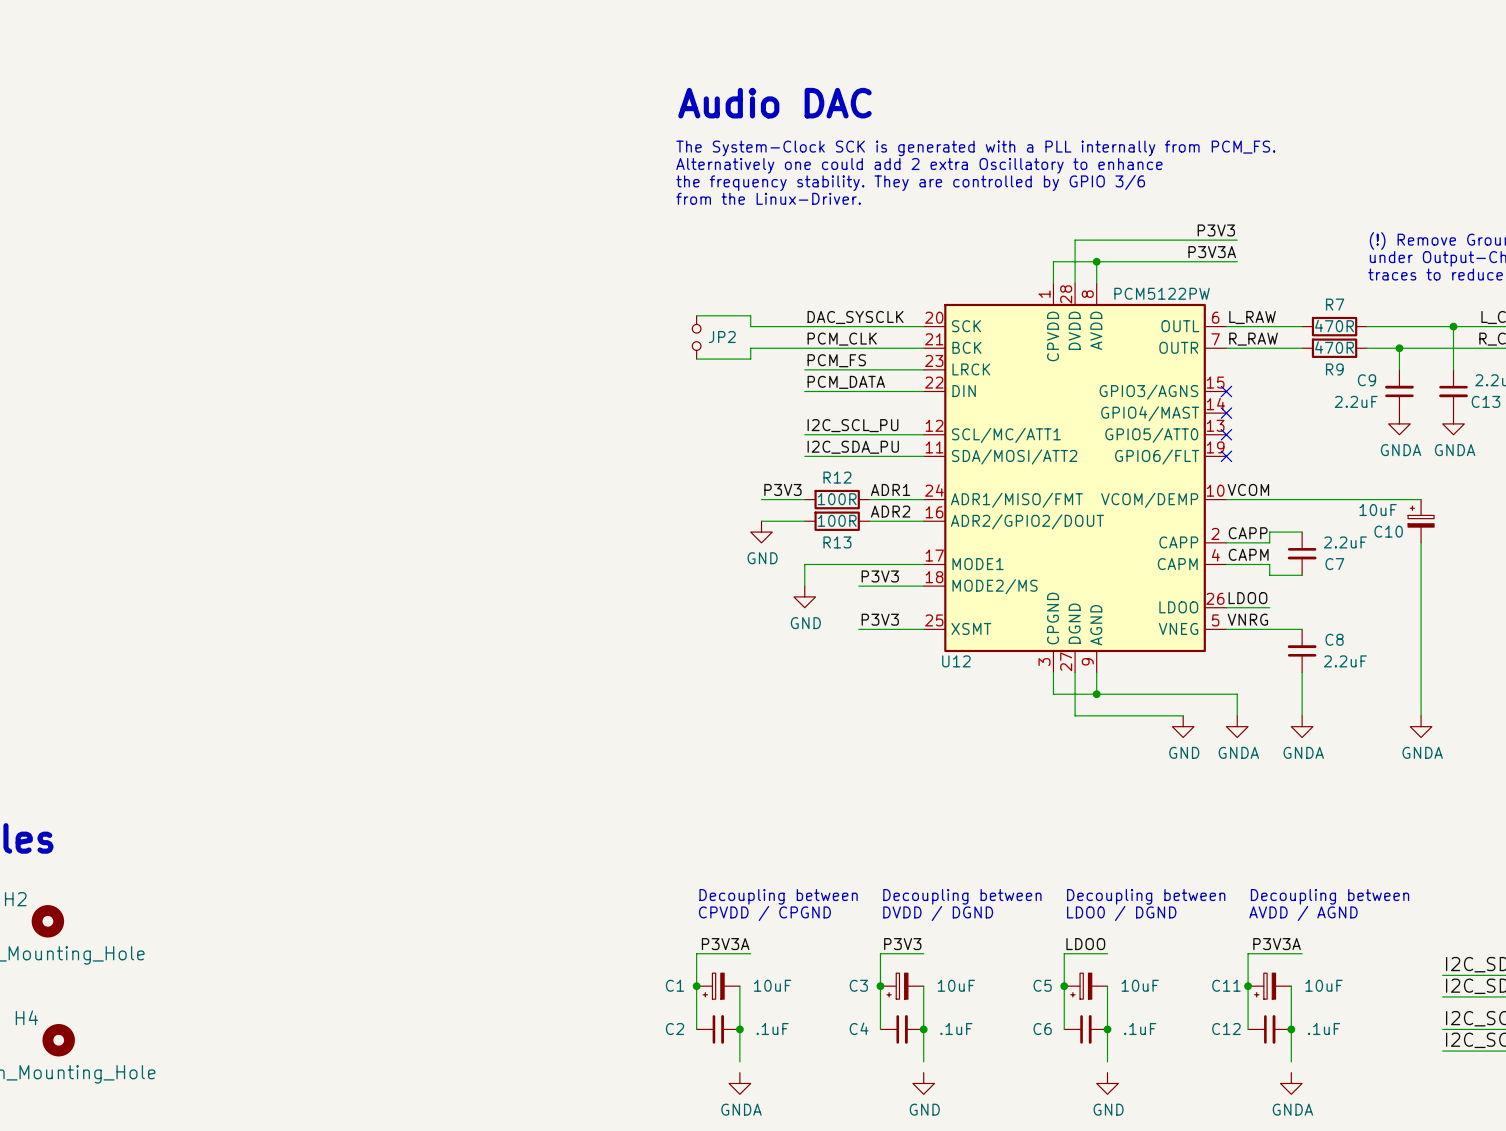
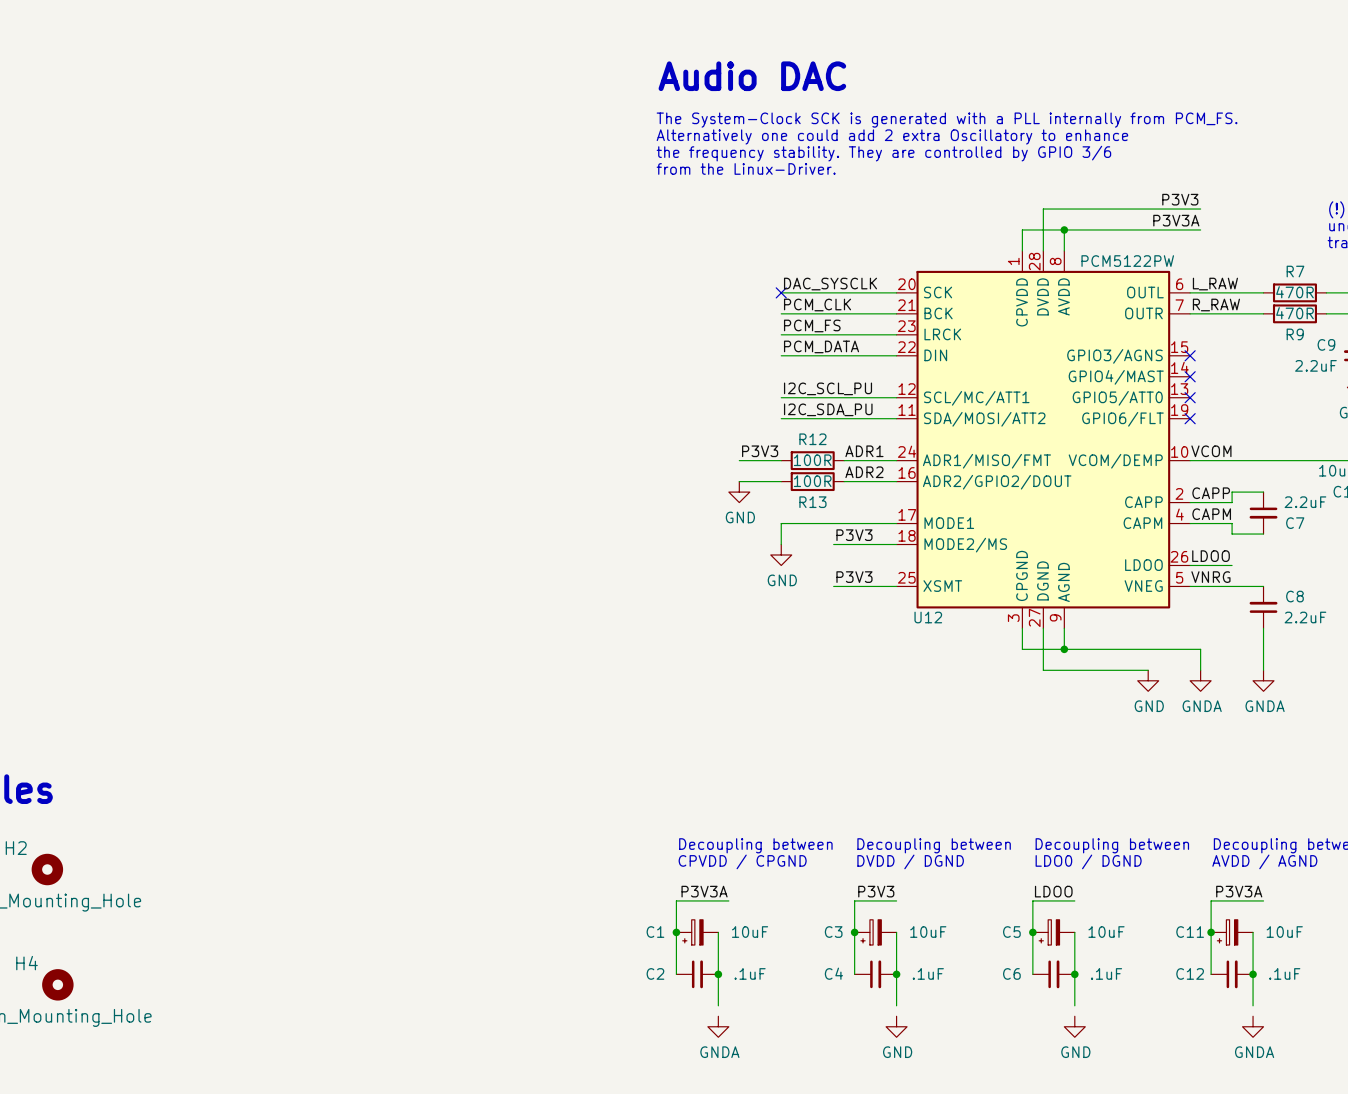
wire: (696, 315) (750, 315) (750, 326) (804, 326) -> none
no-connect mark: none -> (781, 292)
JP2: (696, 337) -> none
wire: (804, 348) (750, 348) (750, 359) (696, 359) -> none

